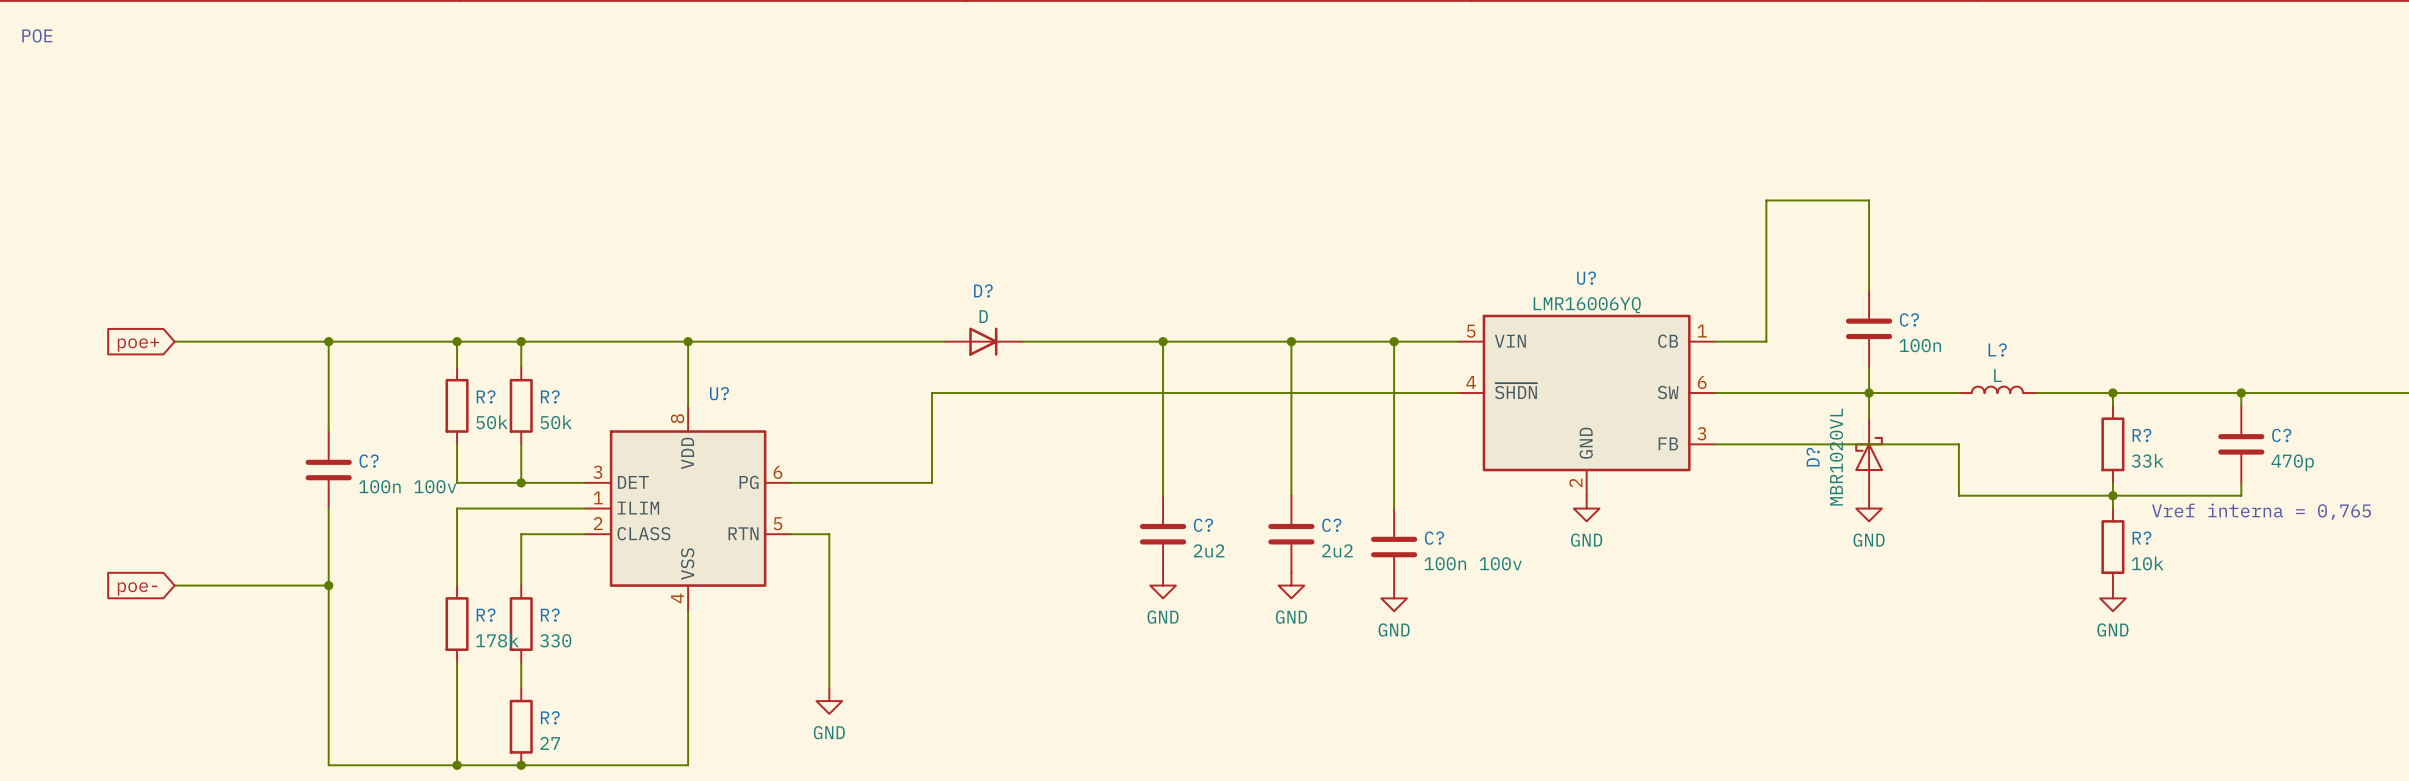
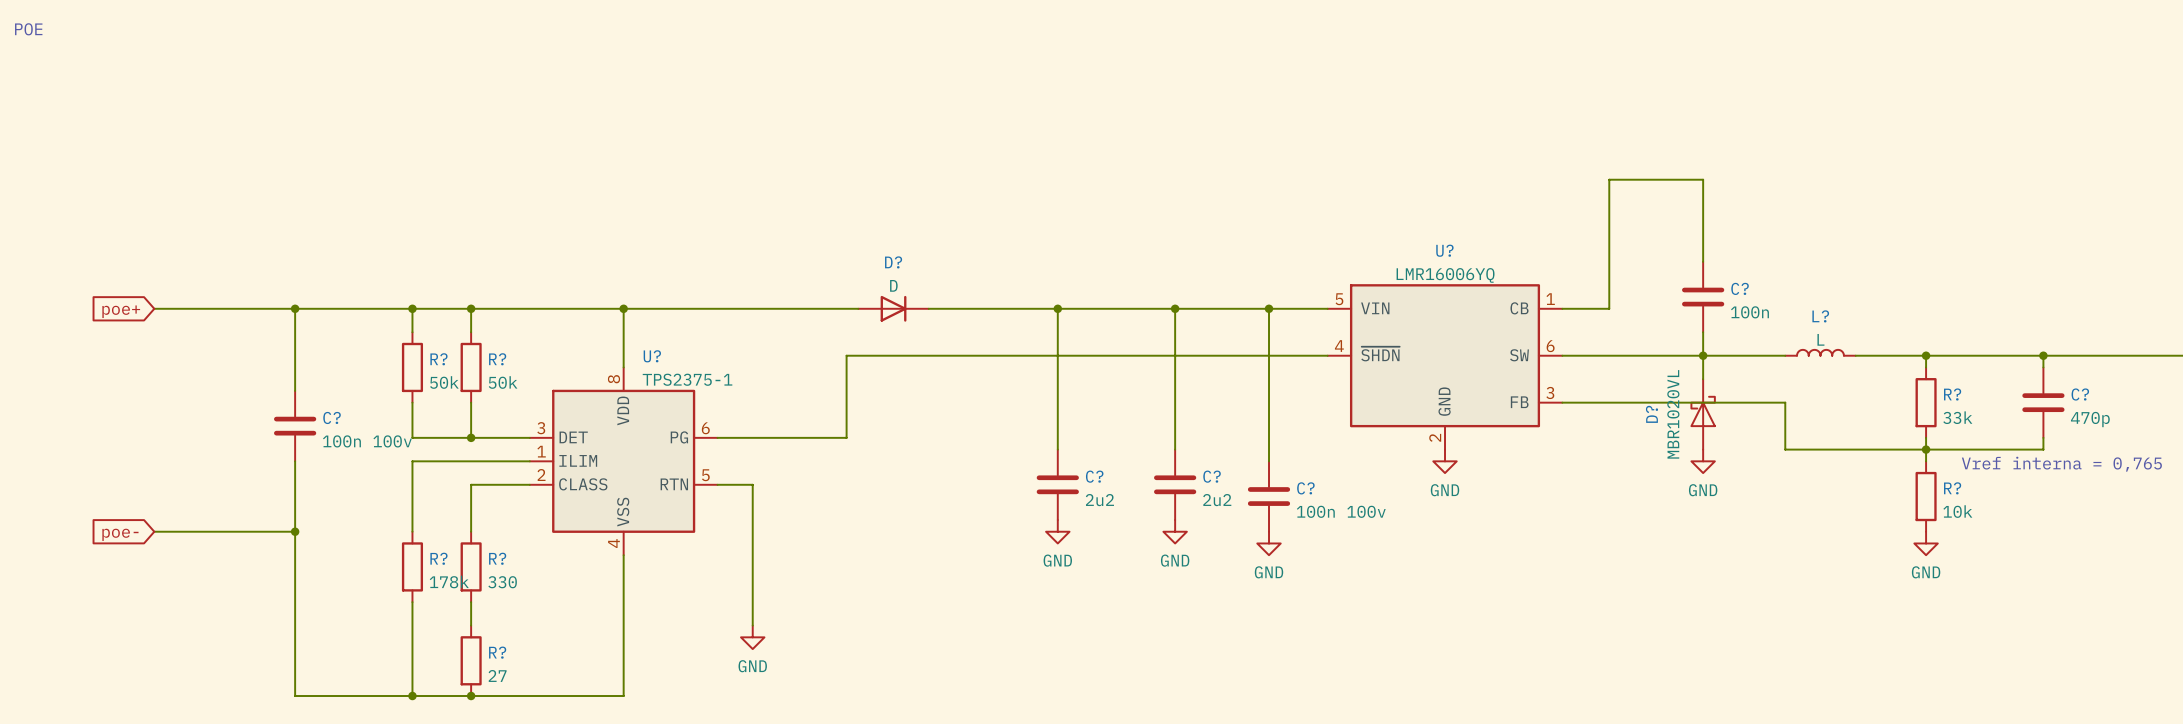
U? value: none -> TPS2375-1 (687, 379)

